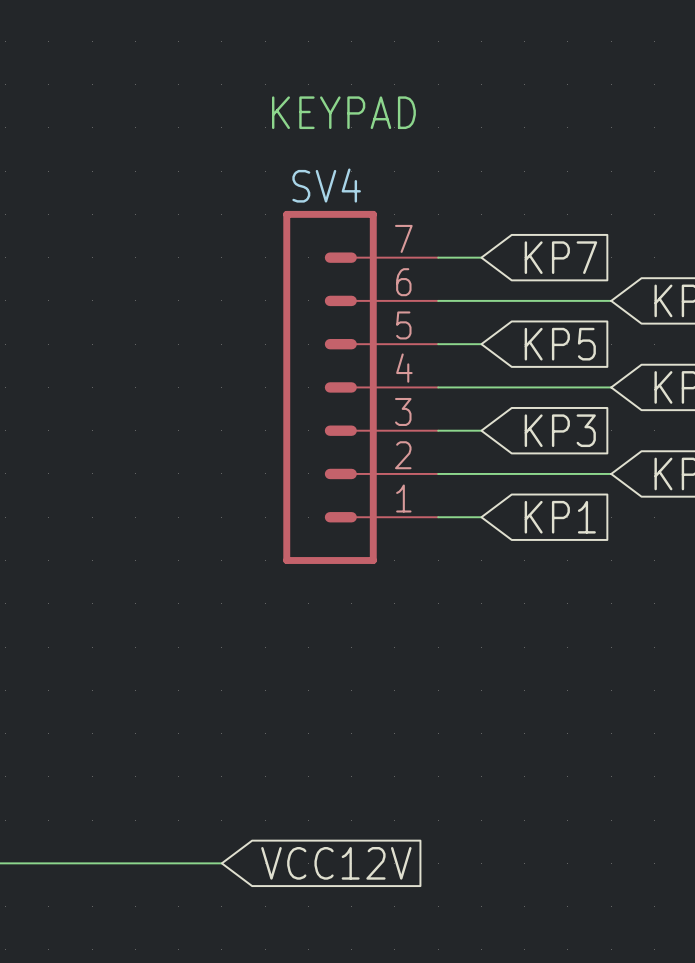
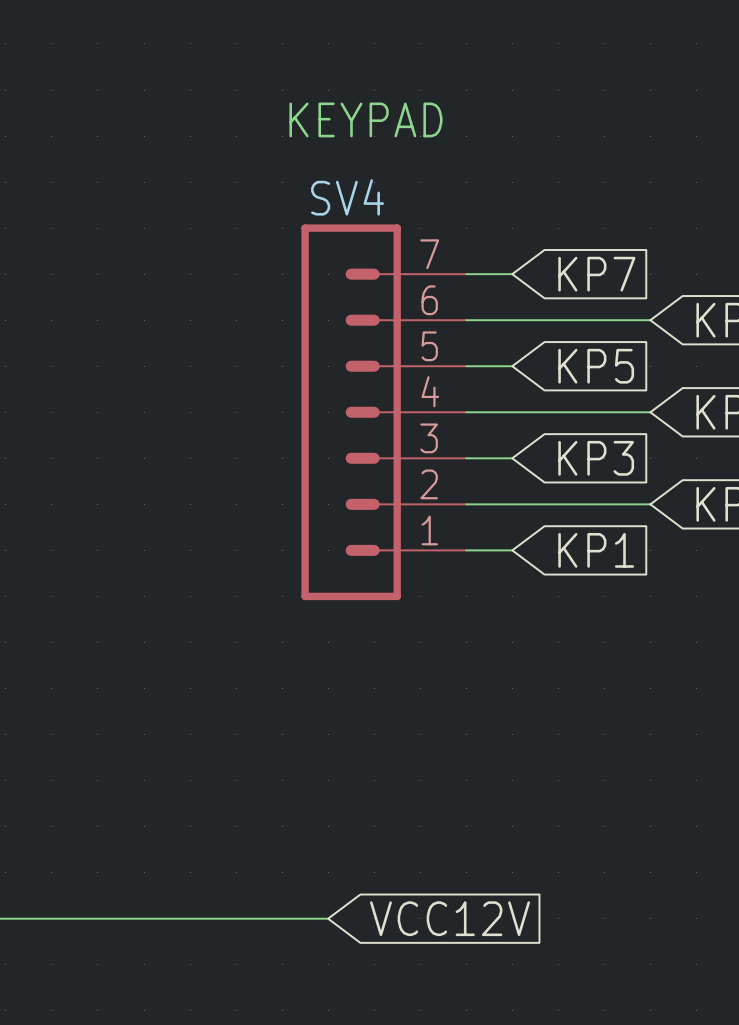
wire: none -> (236, 918) (328, 918)
global label position: VCC12V (336, 863) -> VCC12V (450, 918)

